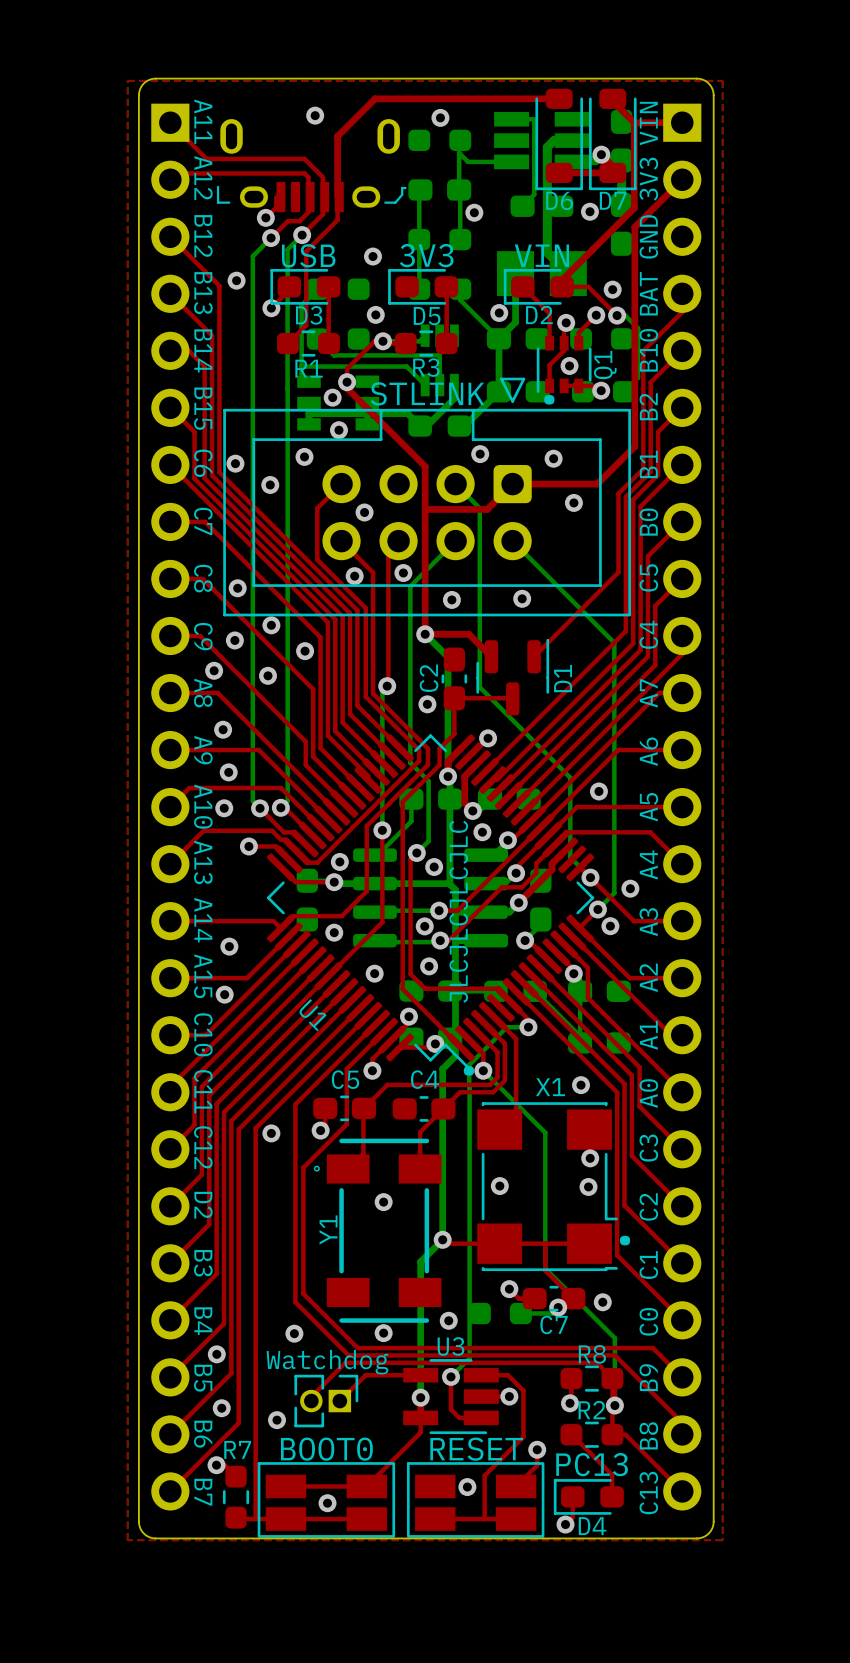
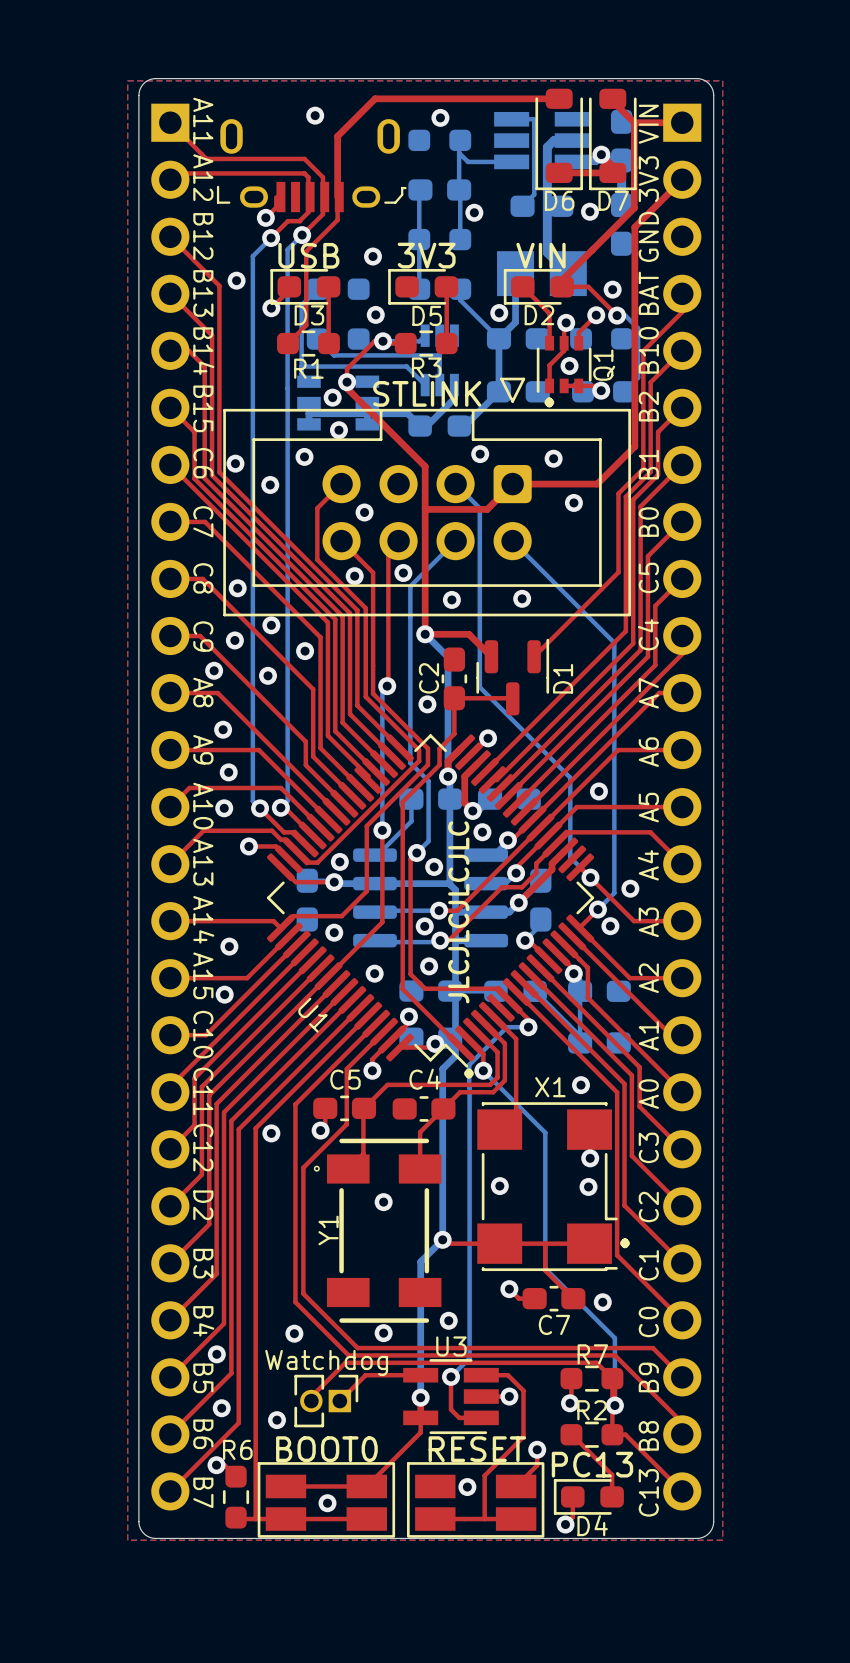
bottom track: (558, 1307) (552, 1313) (520, 1313) -> none
via: (558, 1307) -> none
part: (500, 1313) -> none
R8 name: R8 (592, 1354) -> R7 (592, 1354)
R7 name: R7 (237, 1449) -> R6 (237, 1449)

